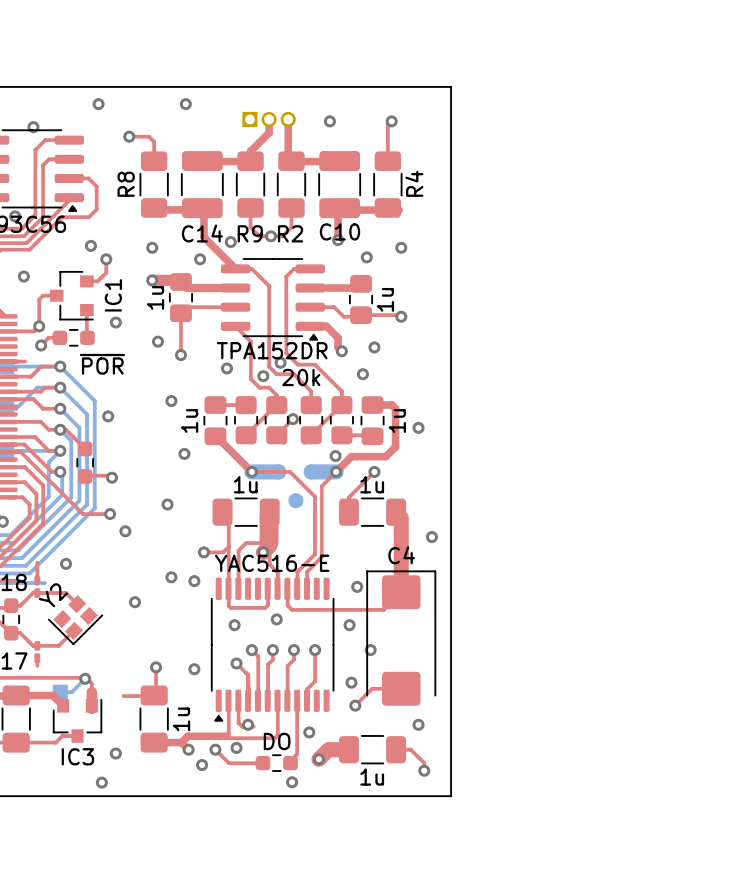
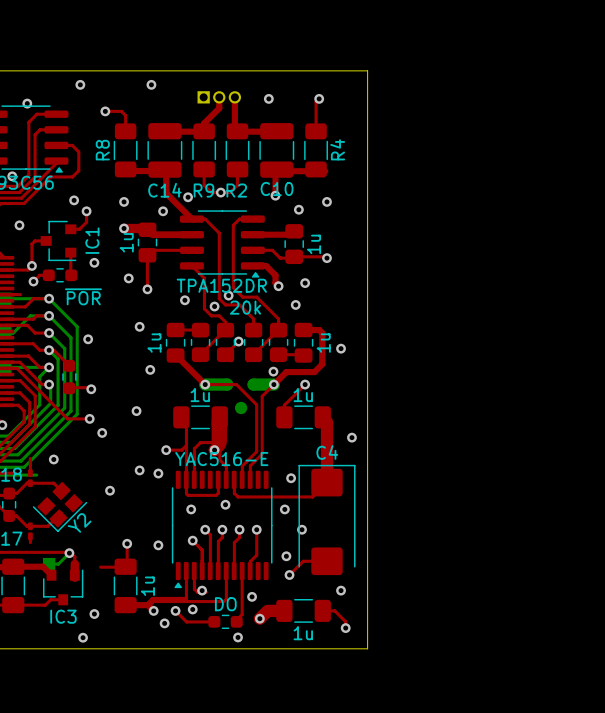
Y2 footprint: [48, 595, 104, 646] -> [32, 481, 88, 533]
Y2 name position: Y2 (53, 595) -> Y2 (79, 522)

